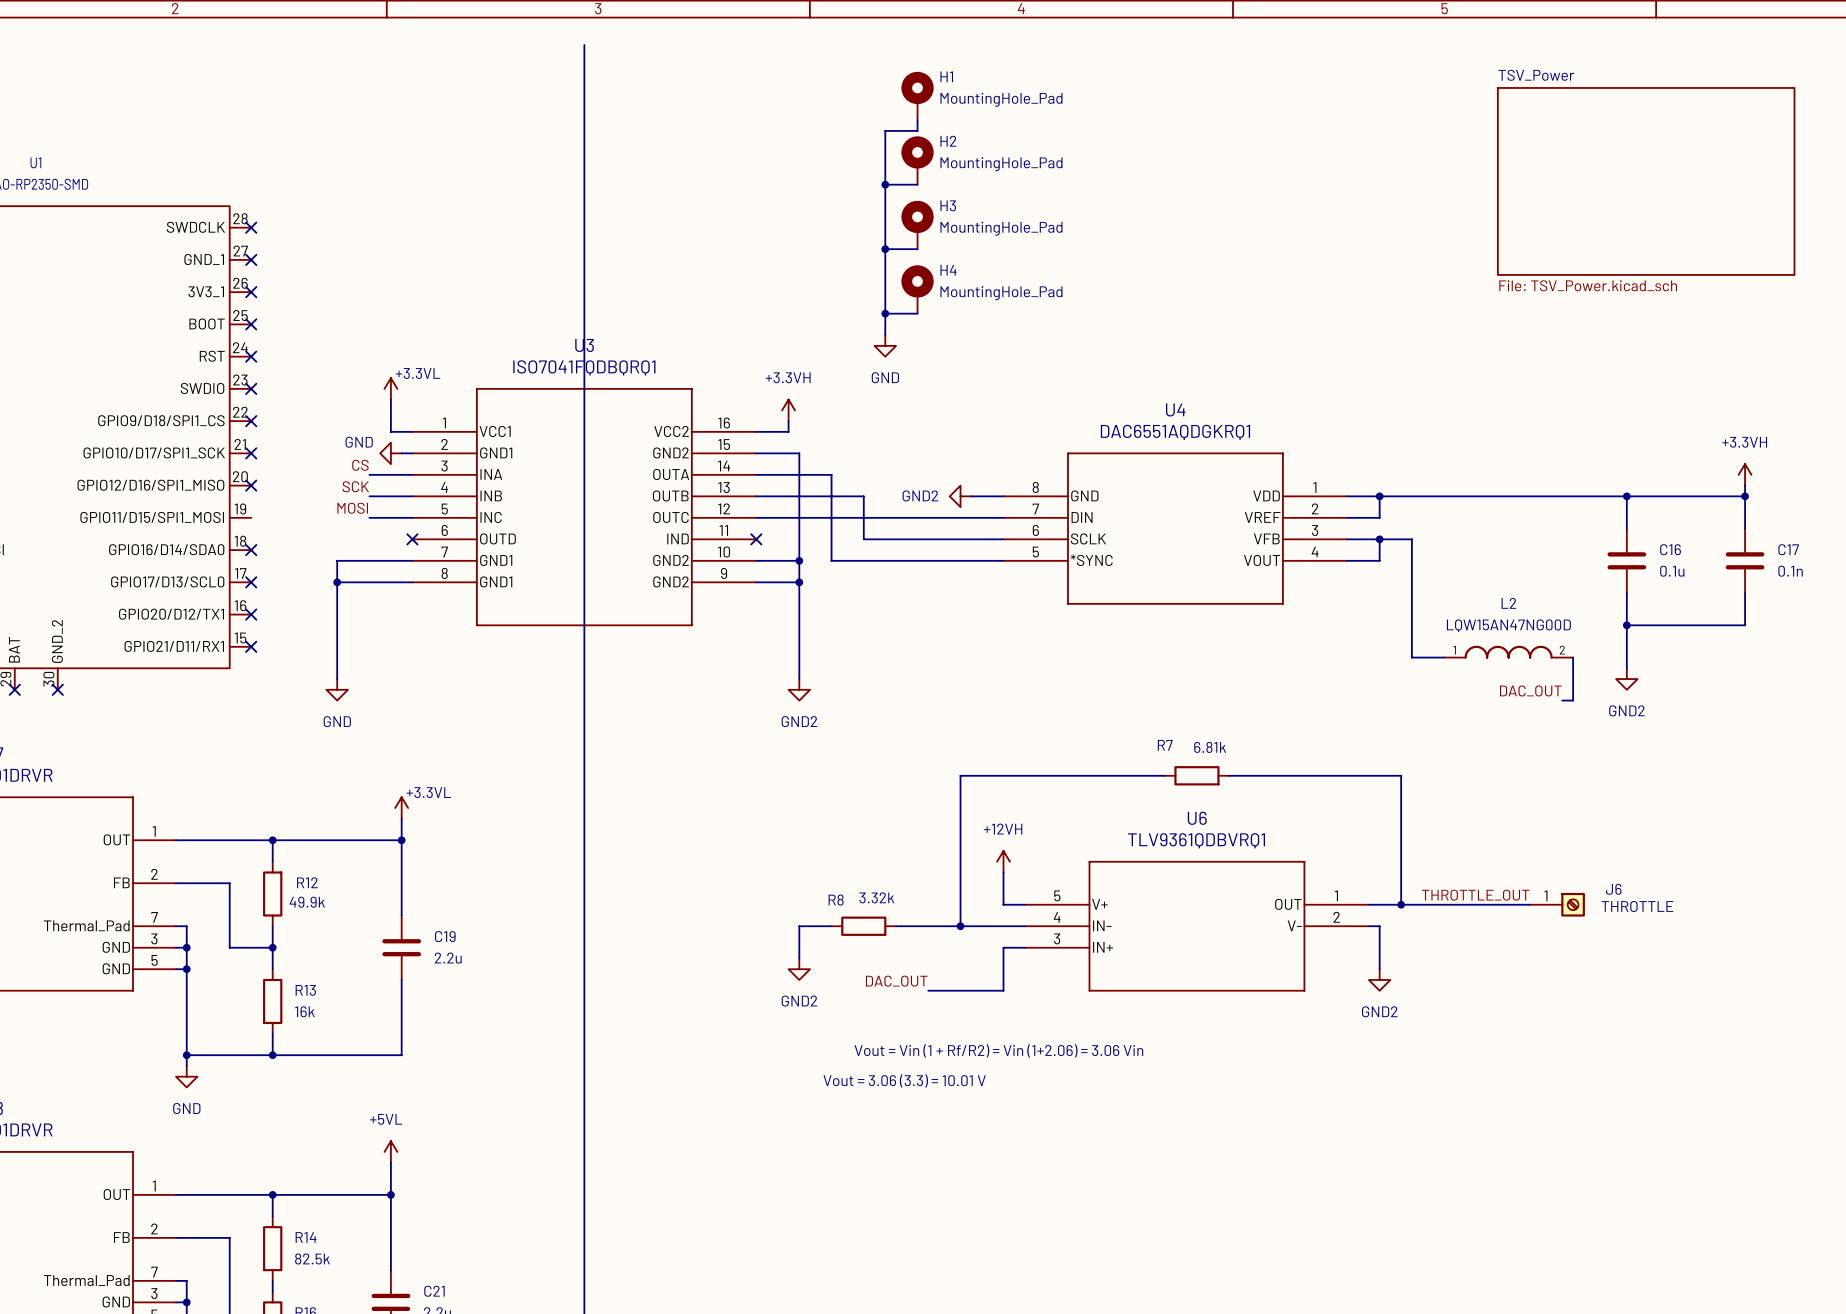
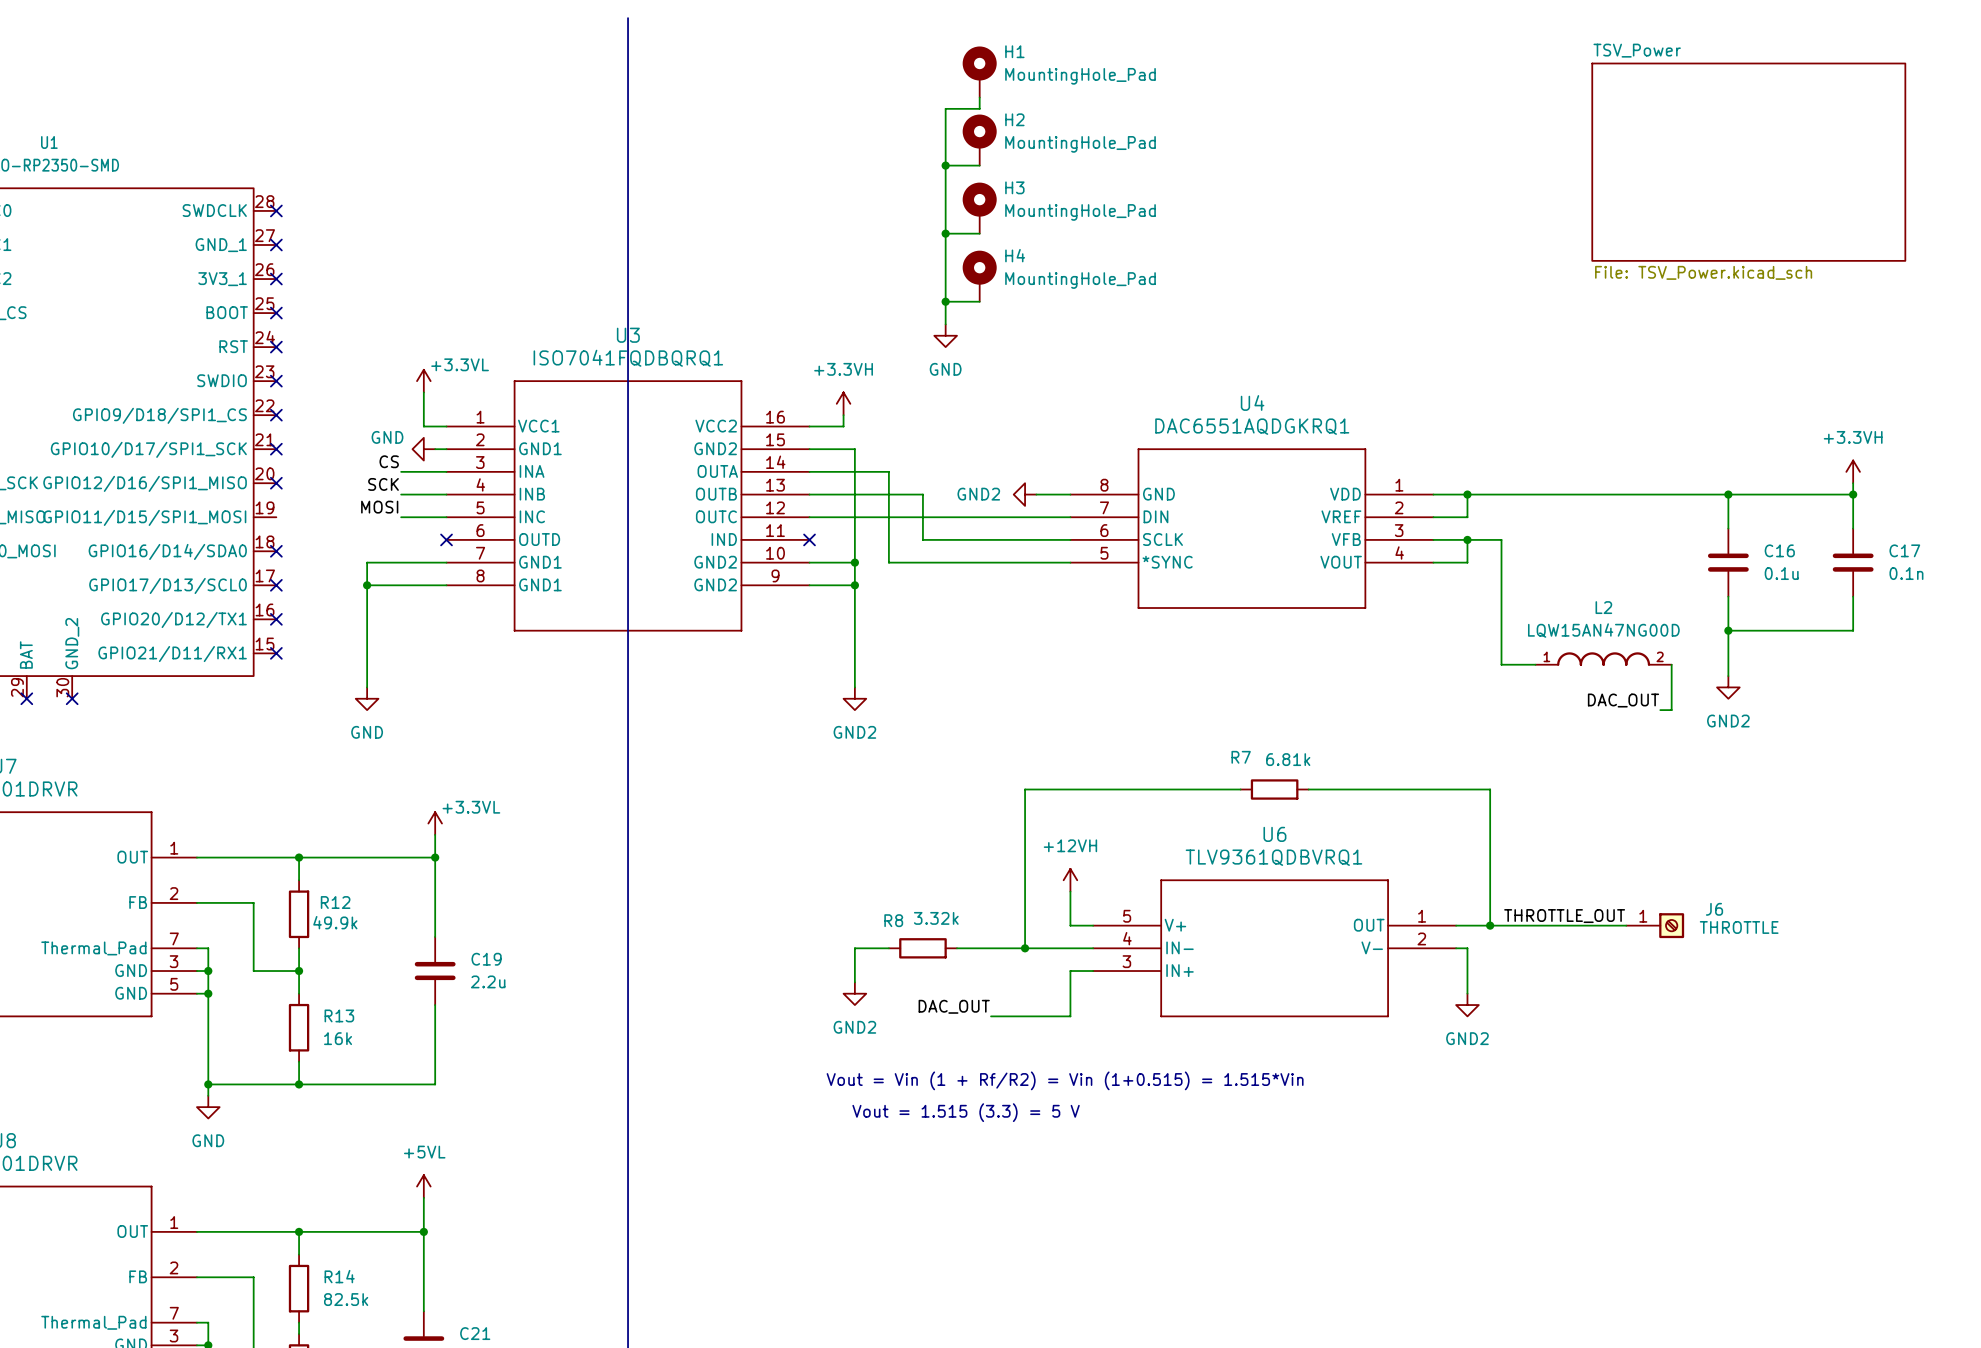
text: Vout = Vin (1 + Rf/R2) = Vin (1+2.06) = 3.06 Vin (998, 1050) -> Vout = Vin (1 + Rf/R2) = Vin (1+0.515) = 1.515*Vin (1065, 1080)
text: Vout = 3.06 (3.3) = 10.01 V (904, 1080) -> Vout = 1.515 (3.3) = 5 V (966, 1112)

